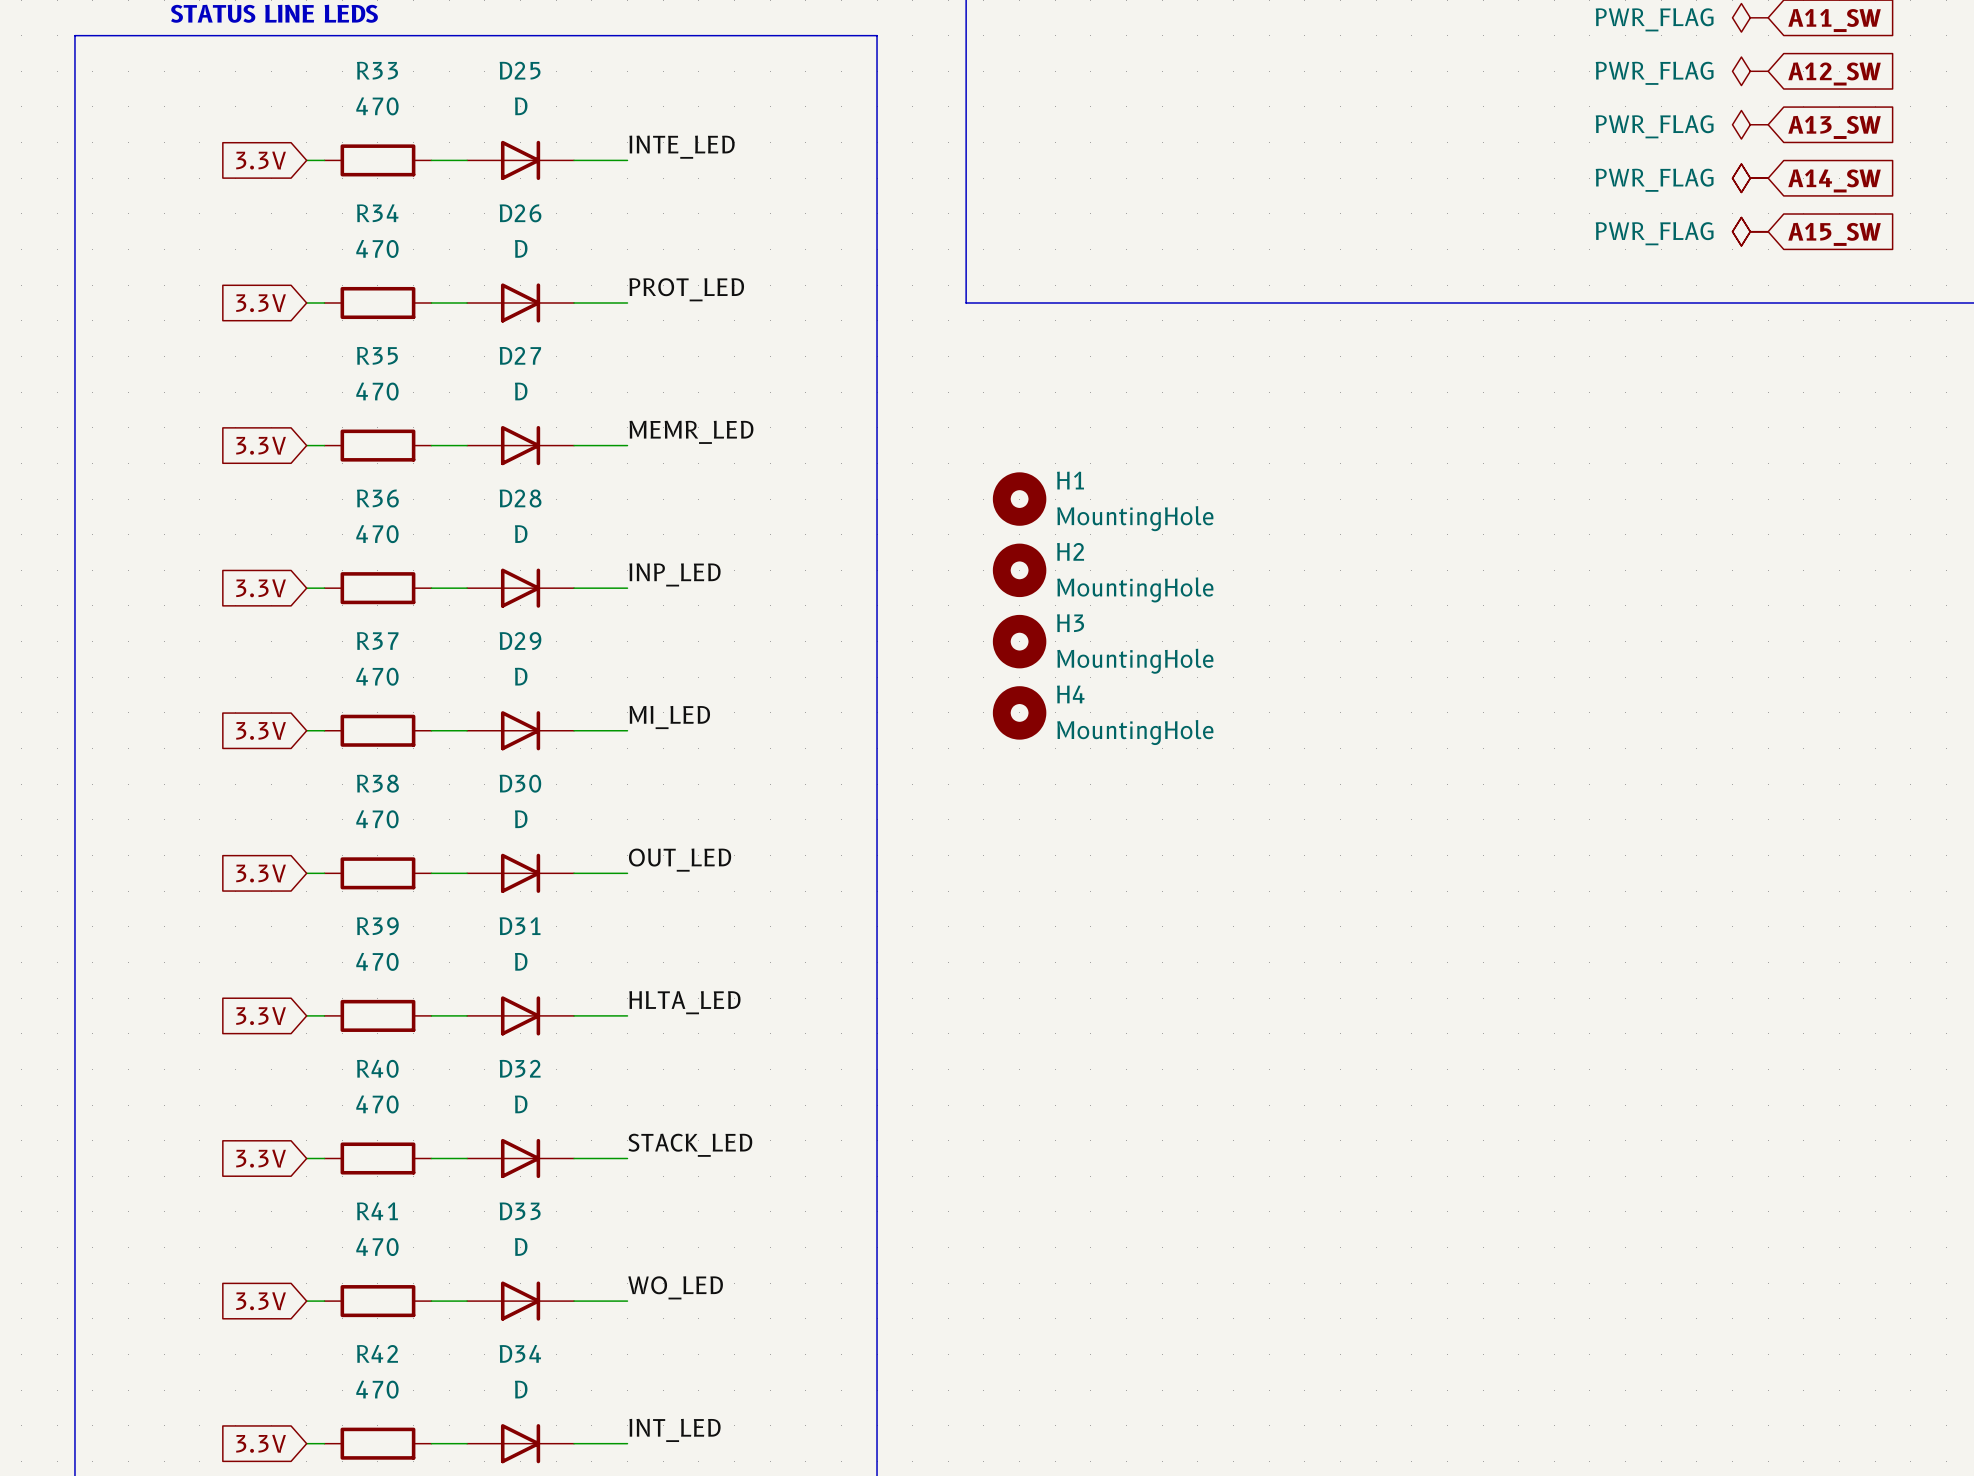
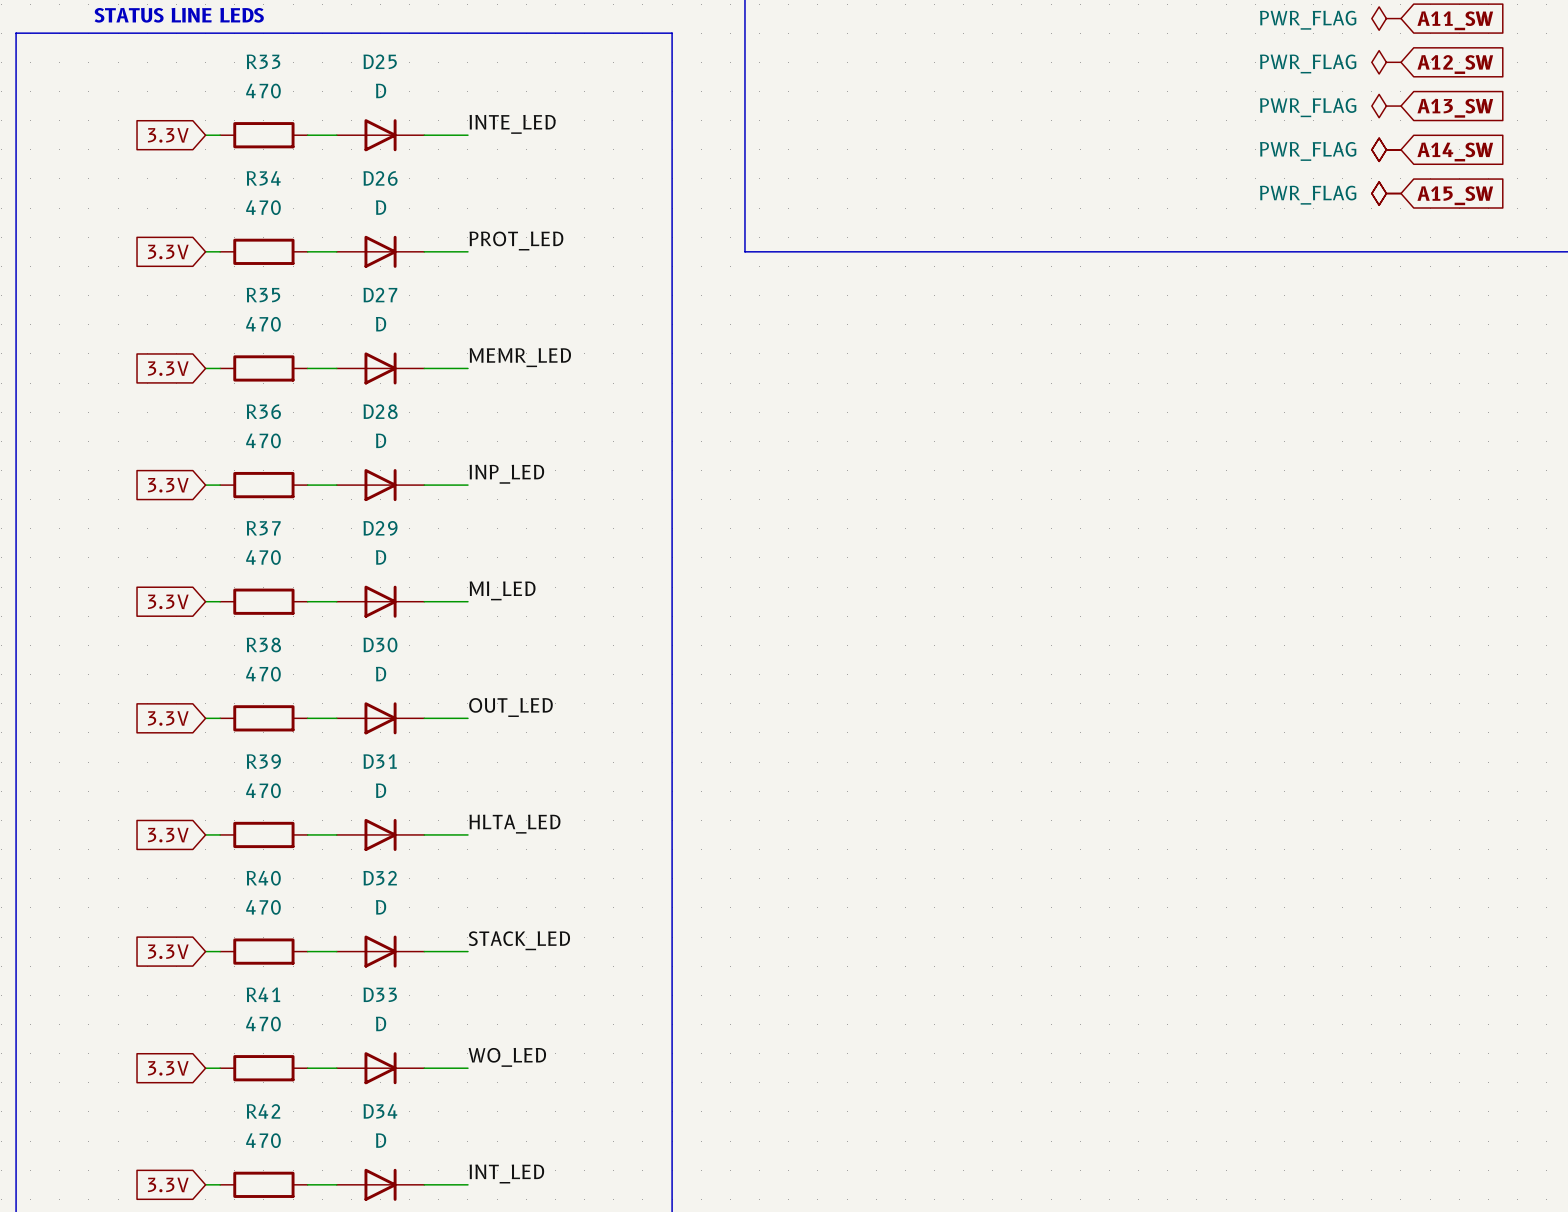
H1: MountingHole (1019, 499) -> none
H2: MountingHole (1019, 570) -> none
H3: MountingHole (1019, 641) -> none
H4: MountingHole (1019, 712) -> none

